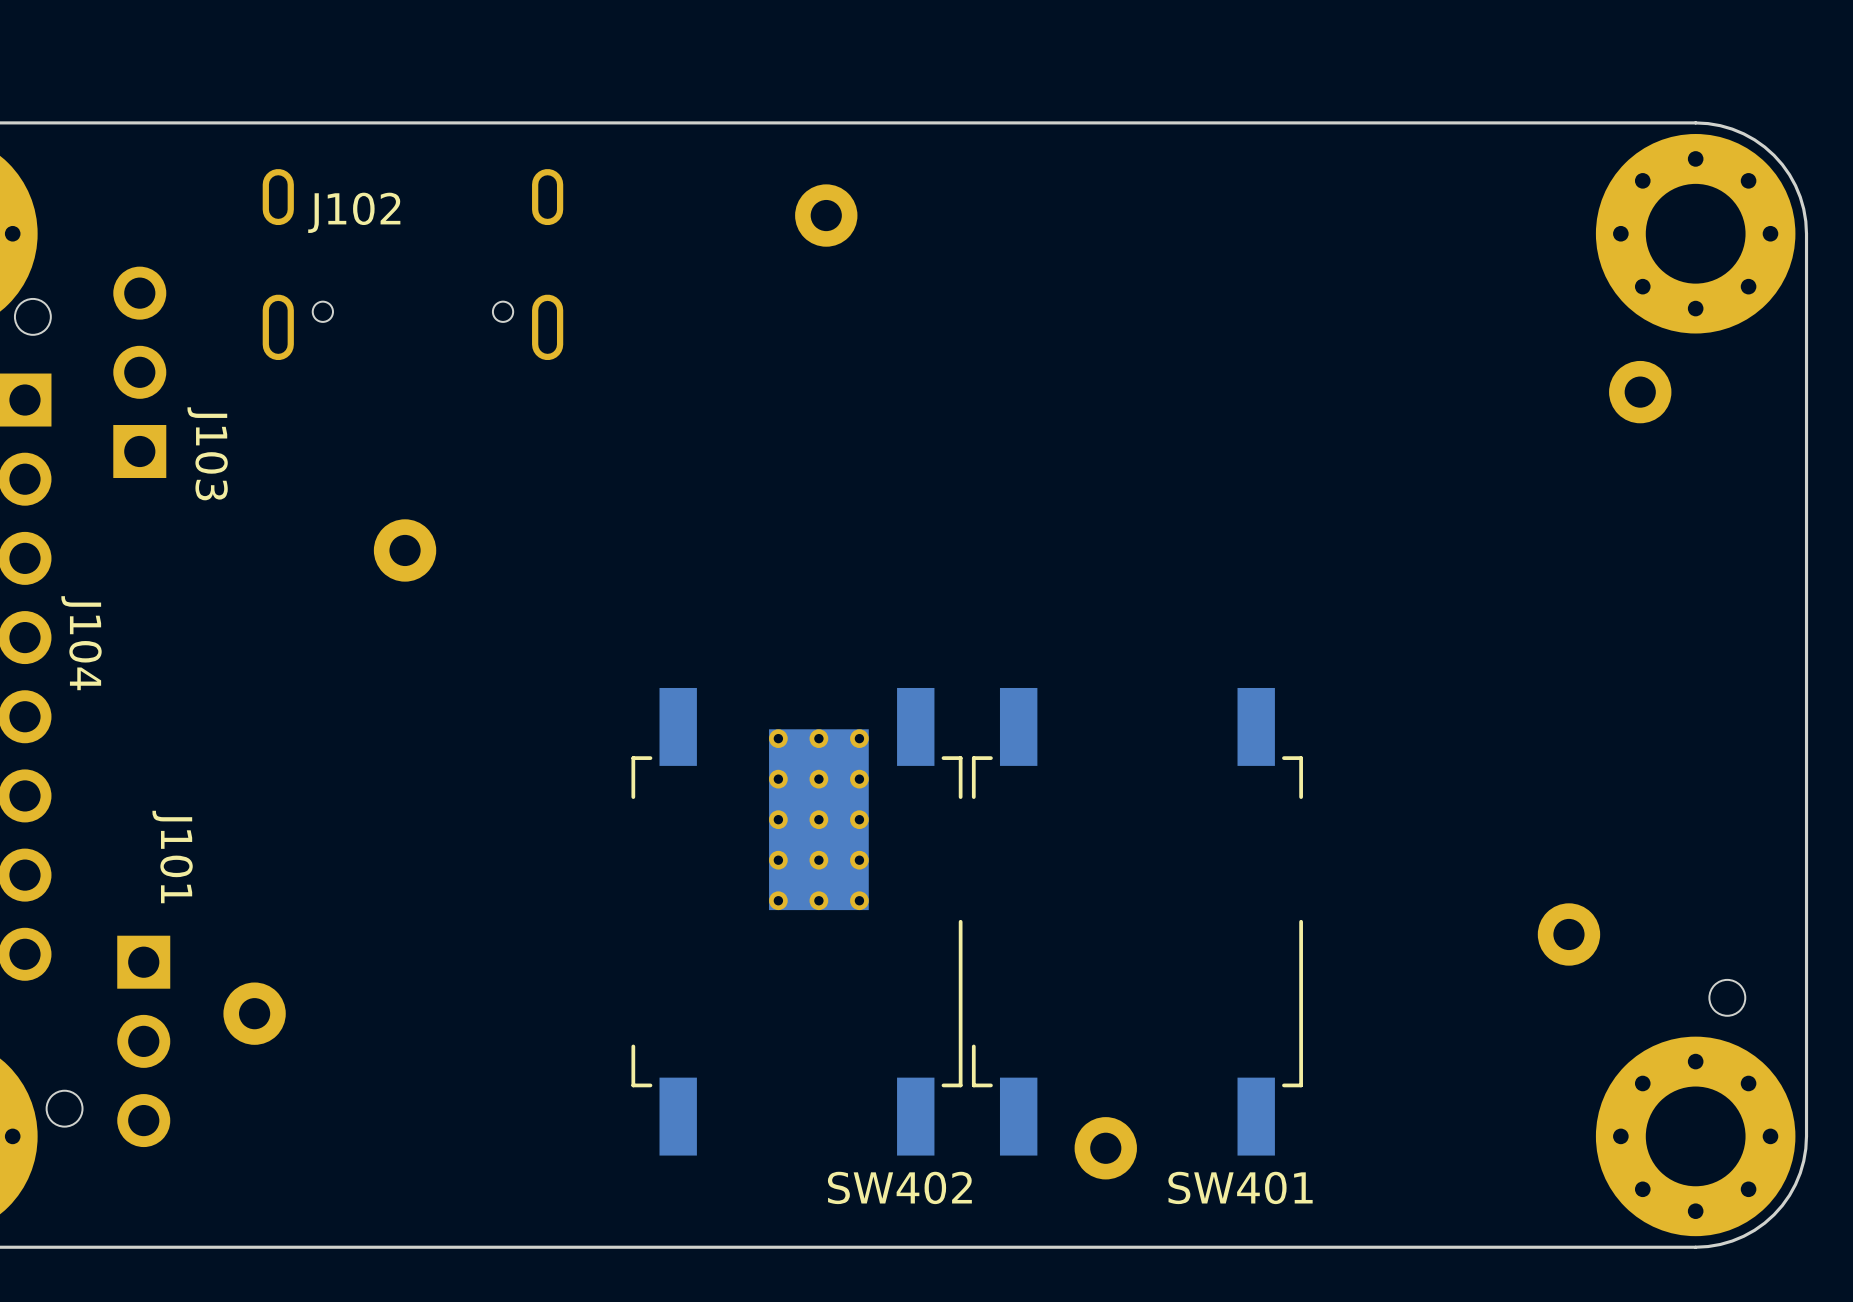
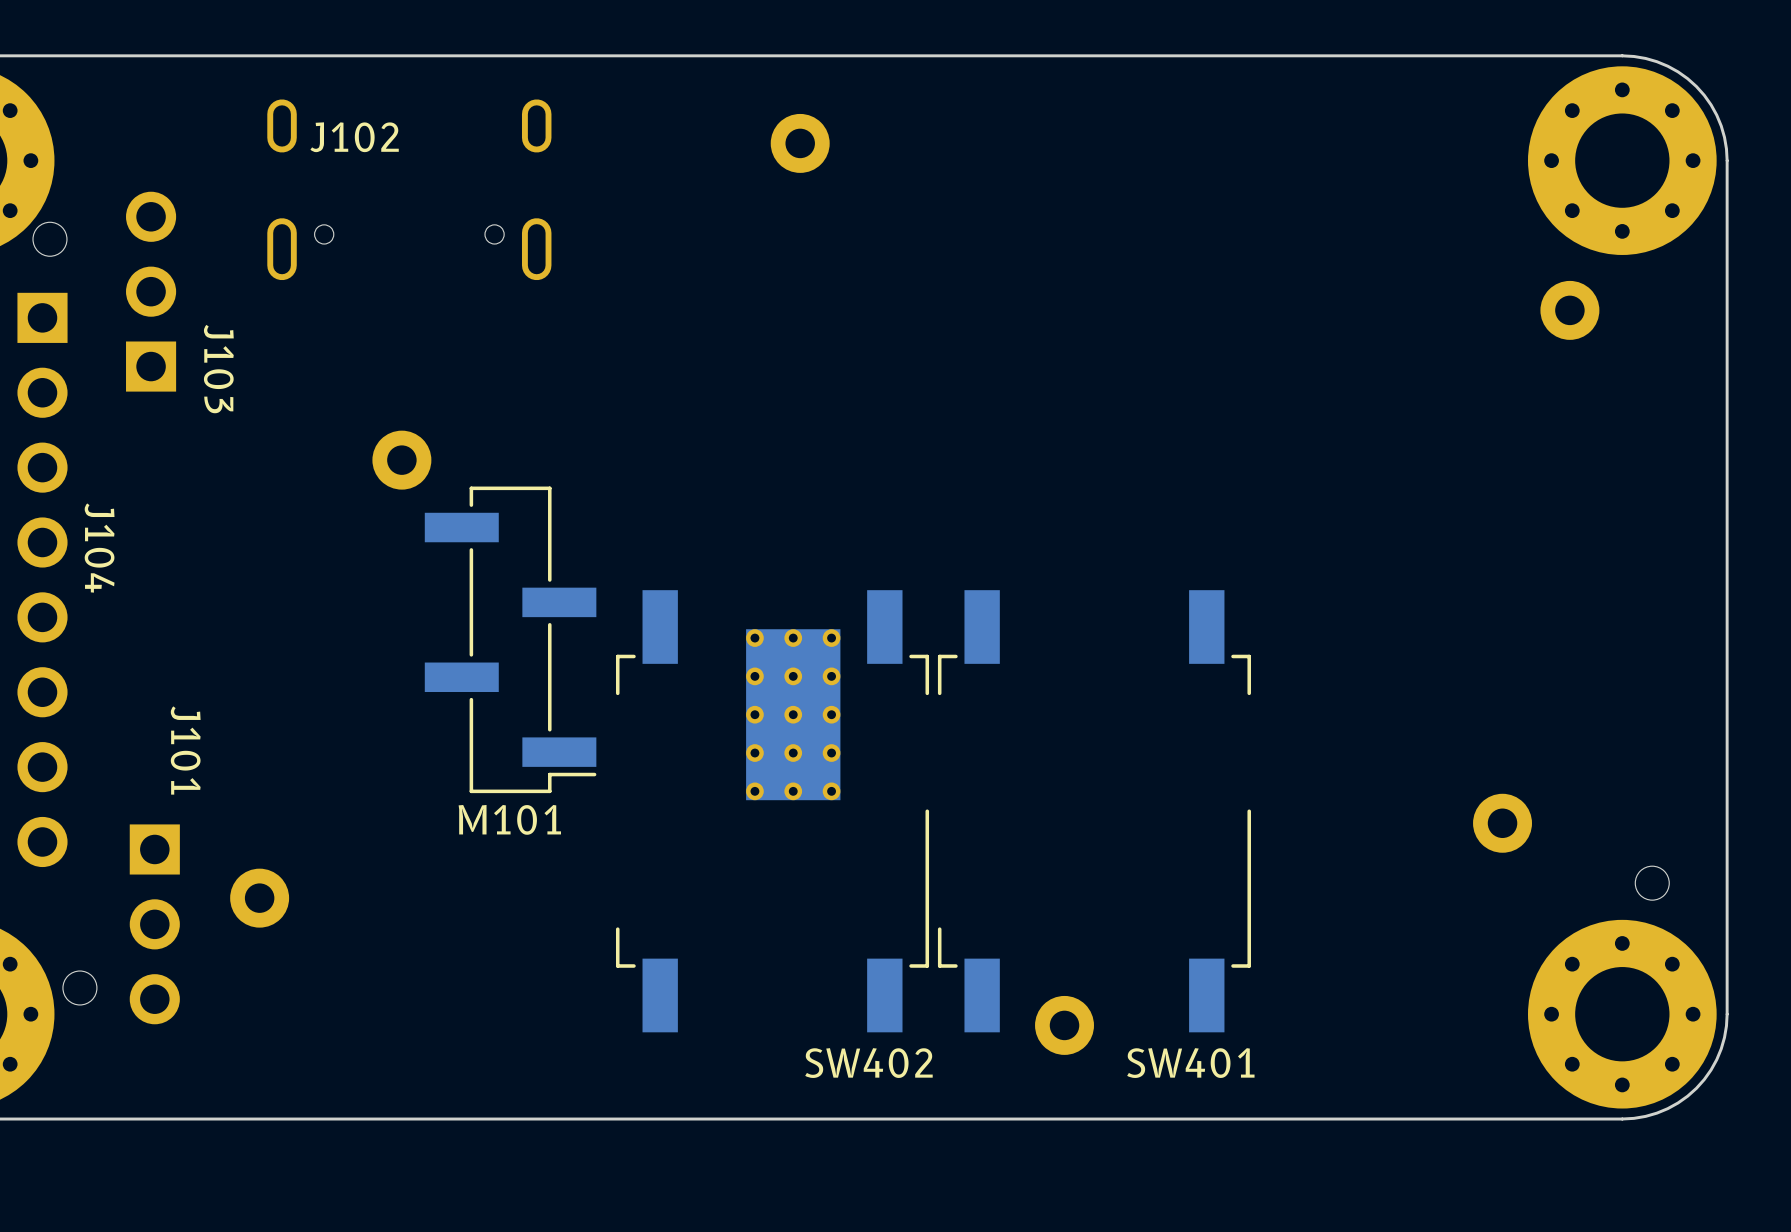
M101: none -> (510, 639)

